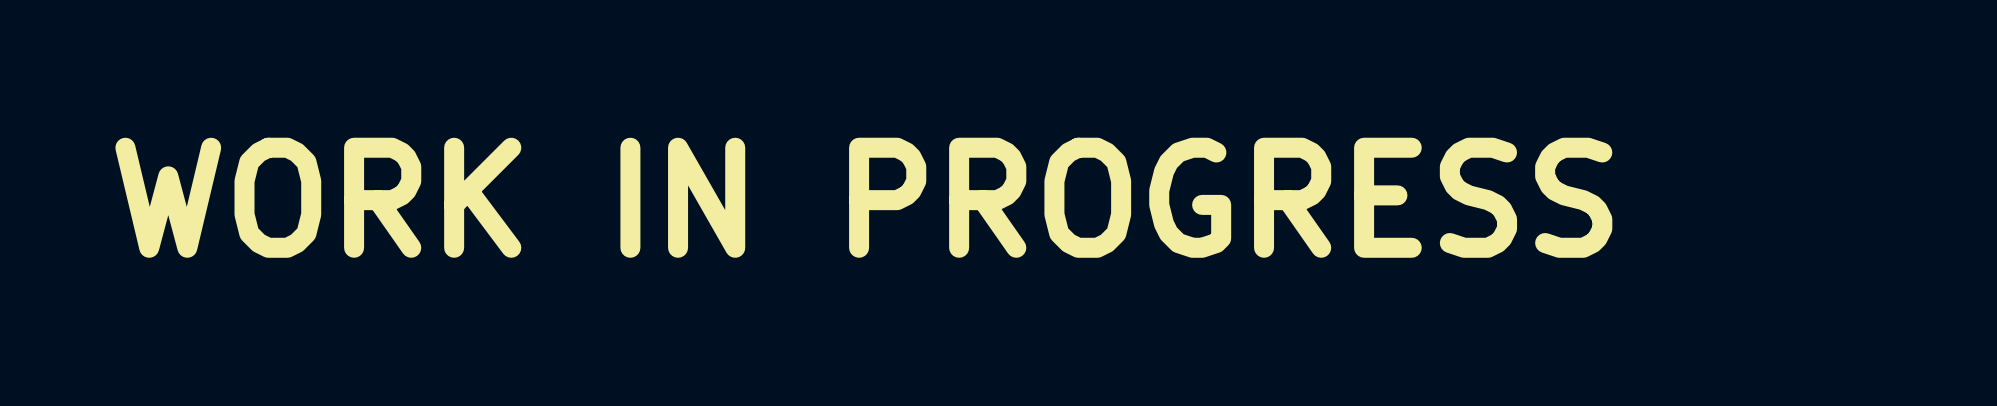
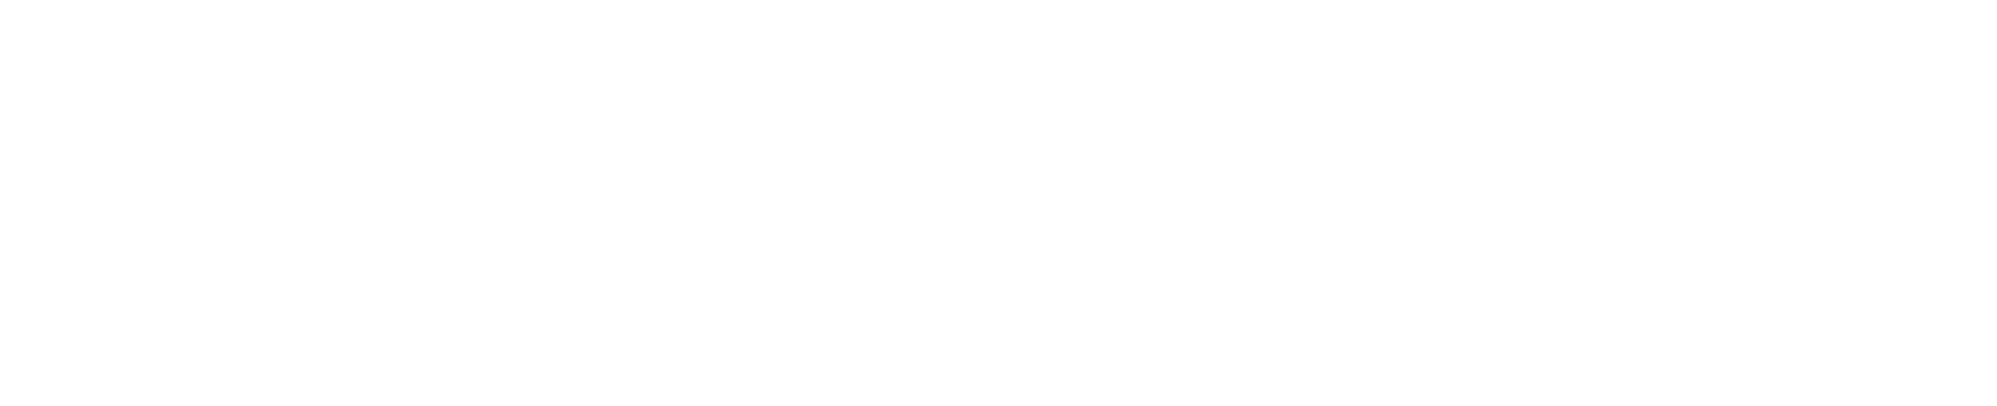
text: WORK IN PROGRESS (863, 197) -> none

